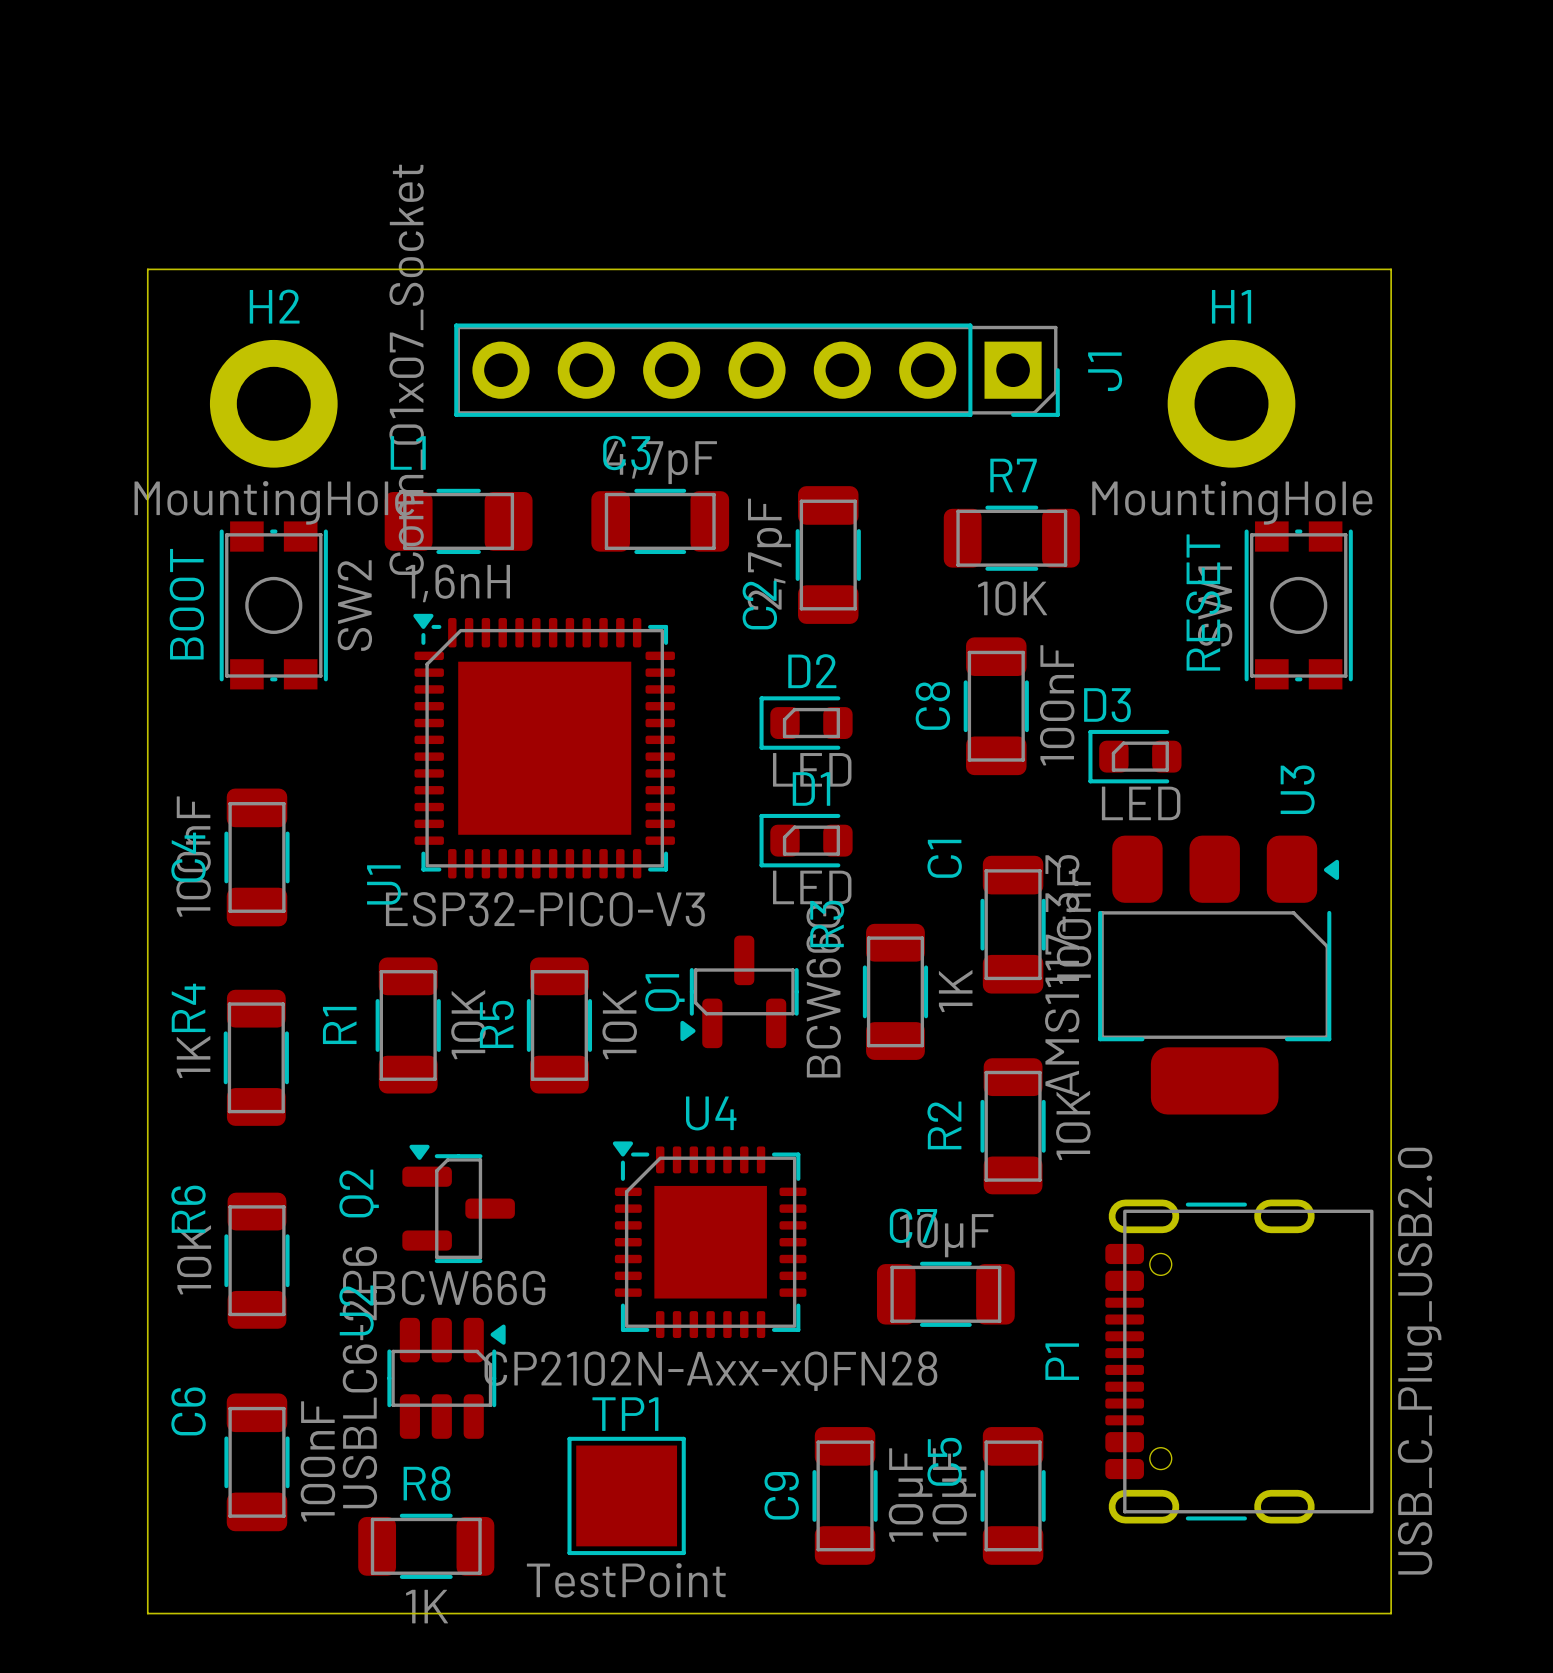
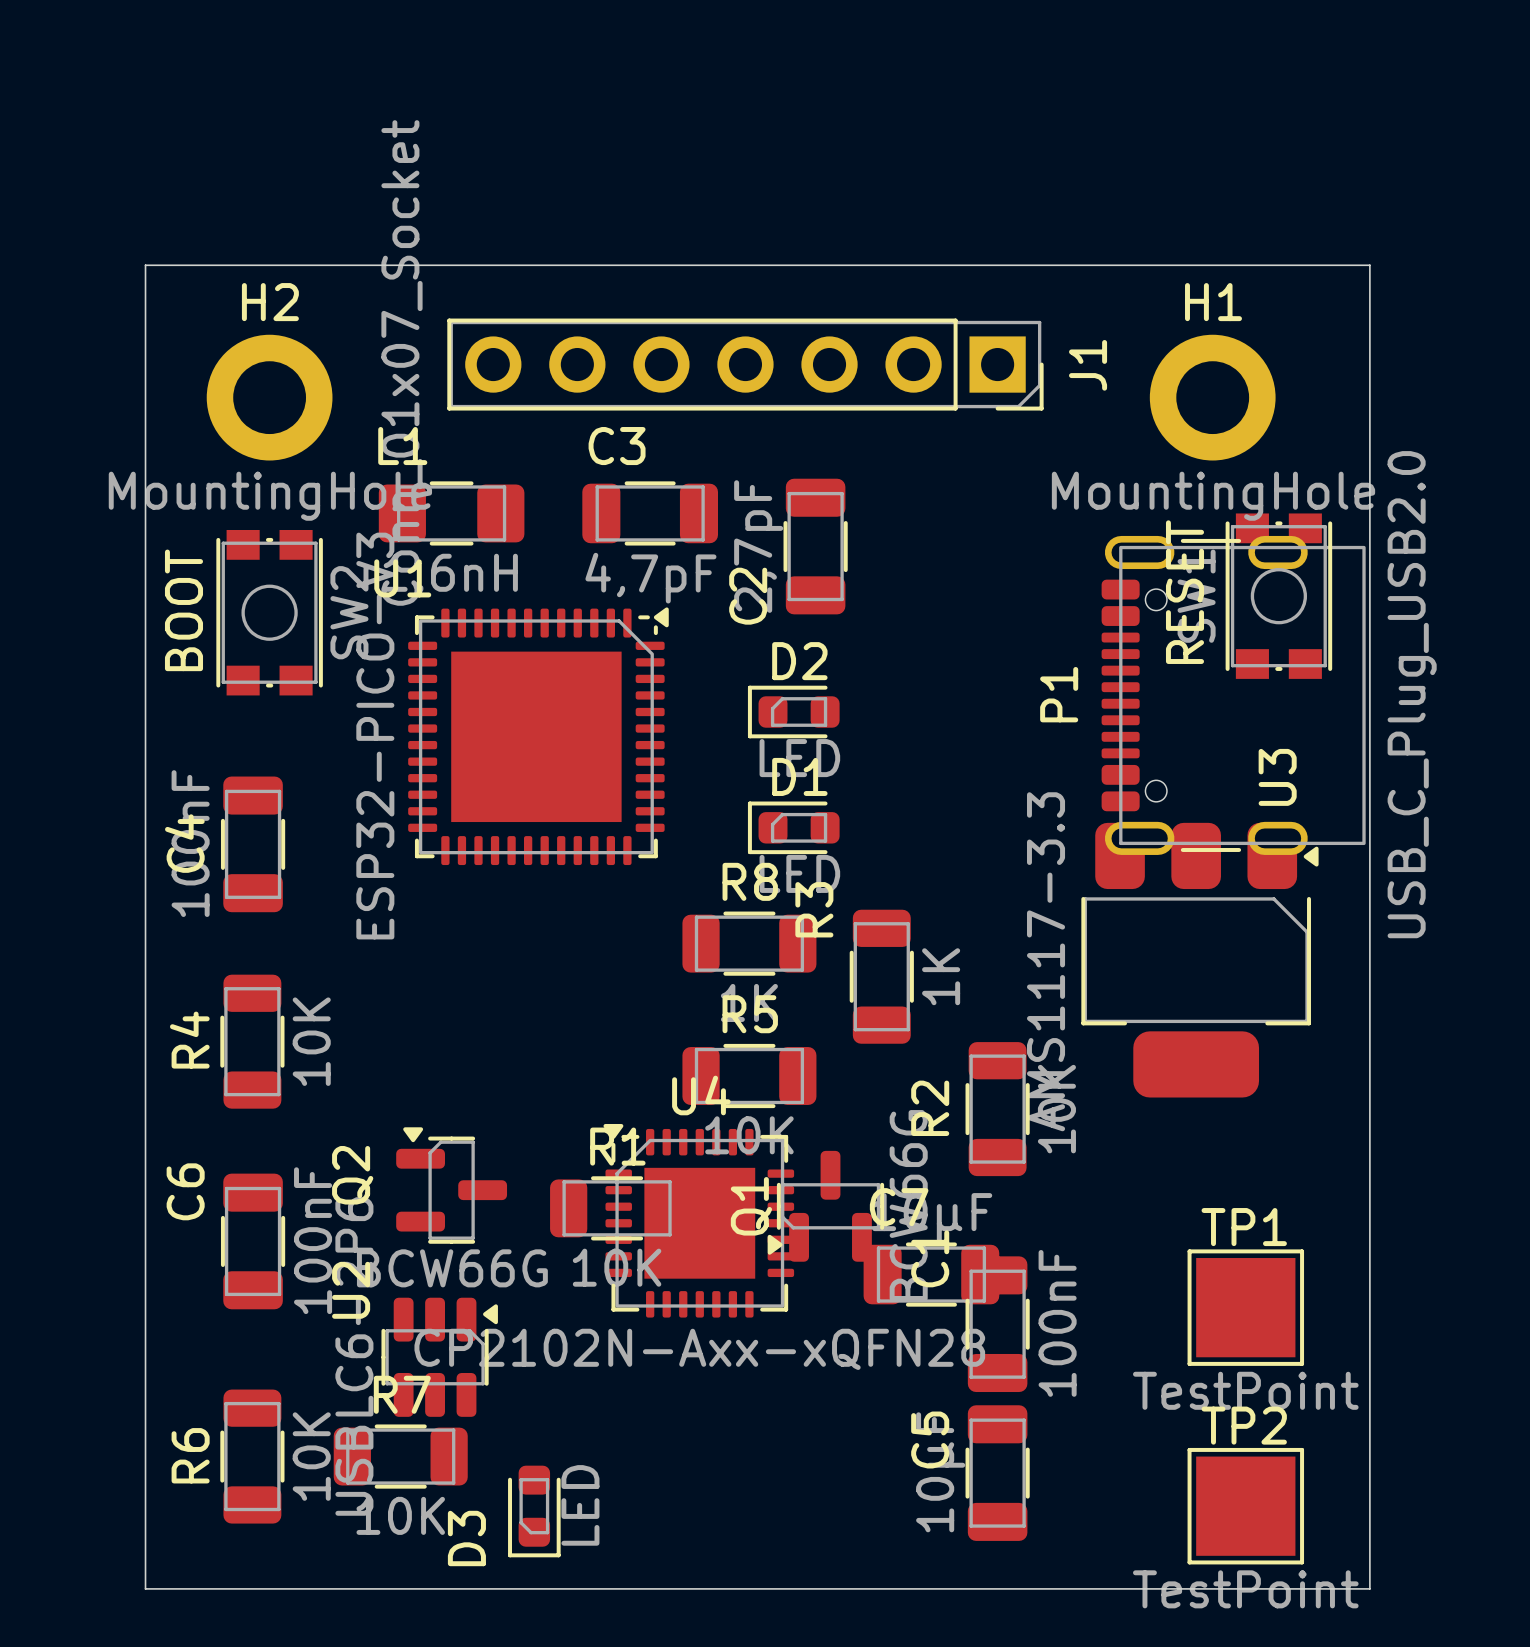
C3 value position: 4,7pF (660, 462) -> 4,7pF (650, 578)
R7 position: (1011, 538) -> (400, 1456)
SW2 position: (273, 605) -> (269, 612)
C8: 100nF (996, 706) -> none
U1 rotation: 0° (544, 746) -> 90° clockwise (538, 736)
D3 rotation: 0° (1134, 756) -> 90° counterclockwise (534, 1511)
D3 position: (1134, 756) -> (534, 1511)
C1 position: (1013, 924) -> (997, 1324)
Q1 position: (739, 991) -> (825, 1206)
R4 name position: R4 (188, 1007) -> R4 (189, 1040)
R1 rotation: 0° (408, 1025) -> 90° clockwise (617, 1208)
R1 position: (408, 1025) -> (617, 1208)
R5 rotation: 0° (559, 1025) -> 90° clockwise (749, 1076)
R5 position: (559, 1025) -> (749, 1076)
R4 value: 1K (193, 1057) -> 10K (311, 1041)
R6 name position: R6 (188, 1209) -> R6 (190, 1455)
R6 value position: 10K (194, 1259) -> 10K (311, 1456)
R6 position: (256, 1260) -> (252, 1456)
P1 position: (1239, 1361) -> (1233, 695)
C6 position: (256, 1462) -> (253, 1241)
TP1 position: (626, 1495) -> (1245, 1307)
C9: 10µF (845, 1495) -> none
TP2: none -> TestPoint (1245, 1506)
R8 position: (426, 1546) -> (749, 943)

